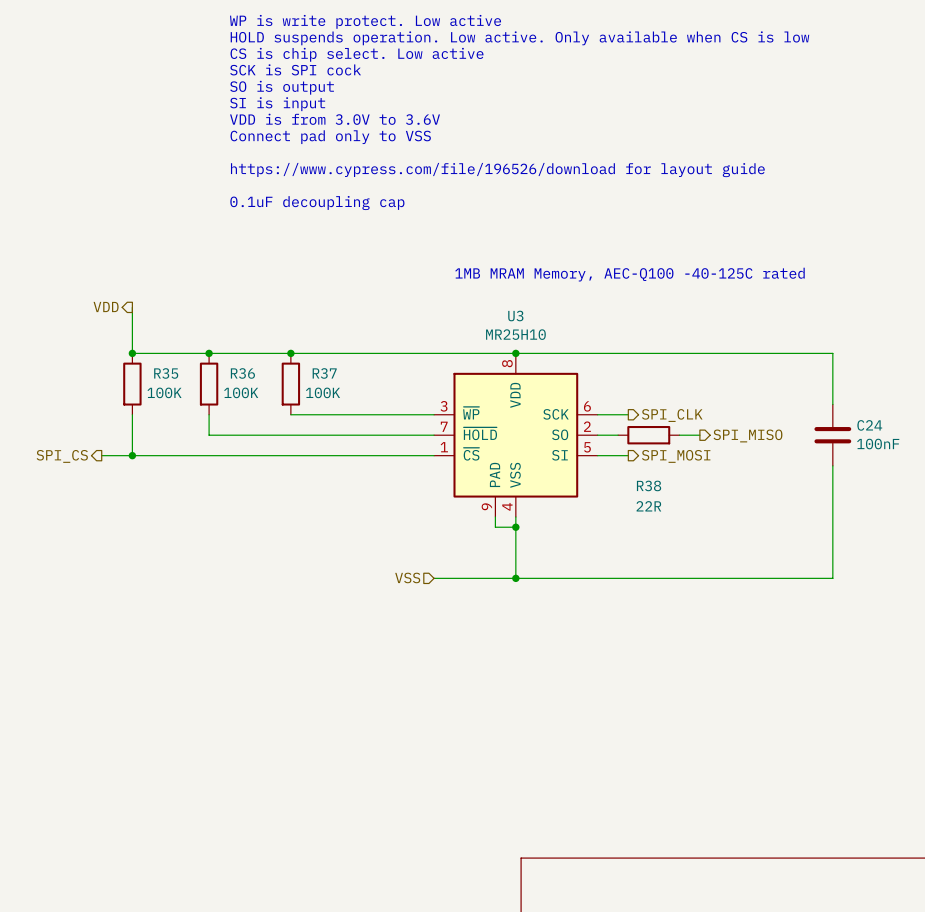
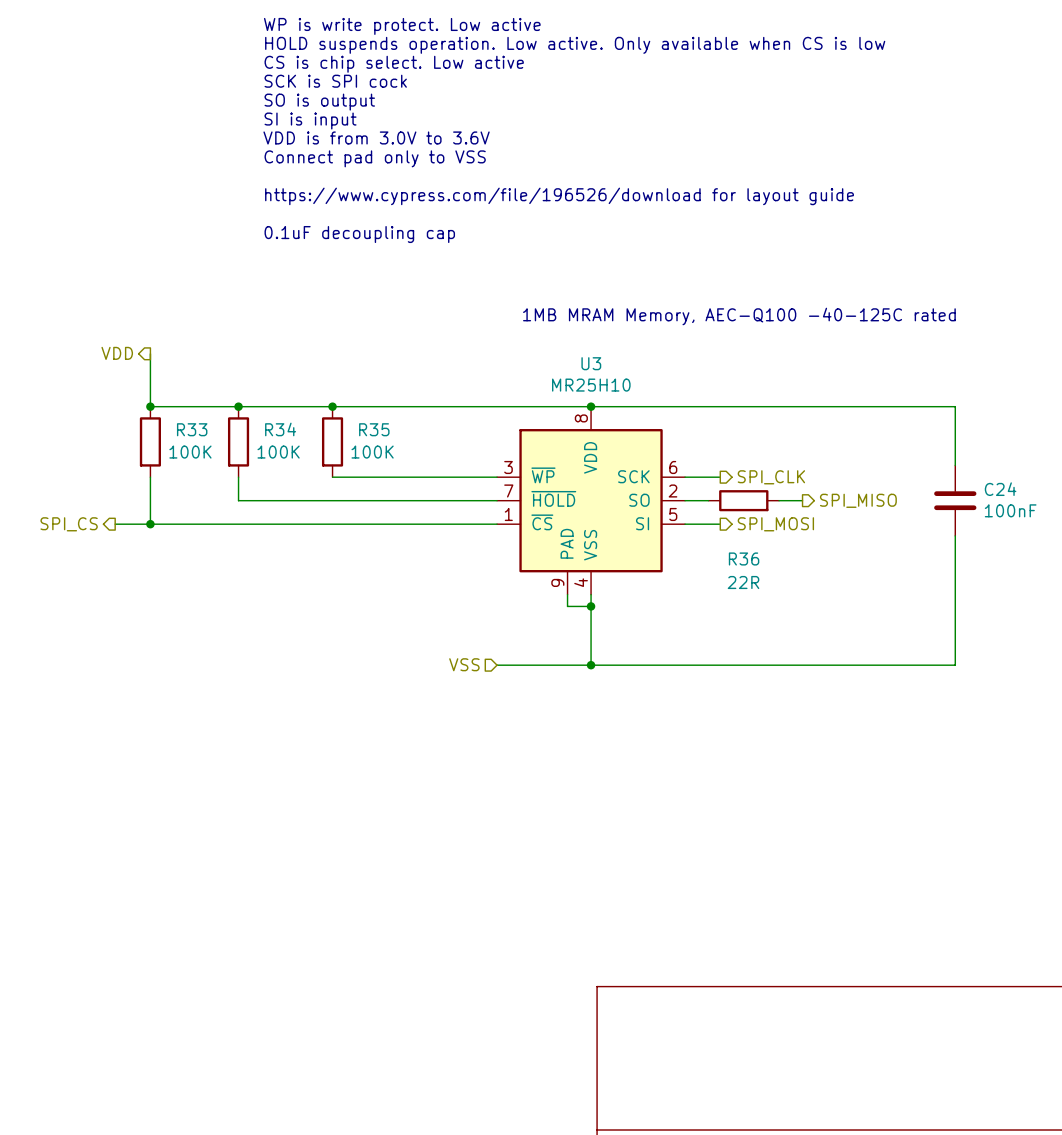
R35 name: R35 (166, 373) -> R33 (192, 429)
R36 name: R36 (242, 373) -> R34 (280, 429)
R37 name: R37 (324, 373) -> R35 (374, 429)
R38 name: R38 (649, 485) -> R36 (744, 558)

